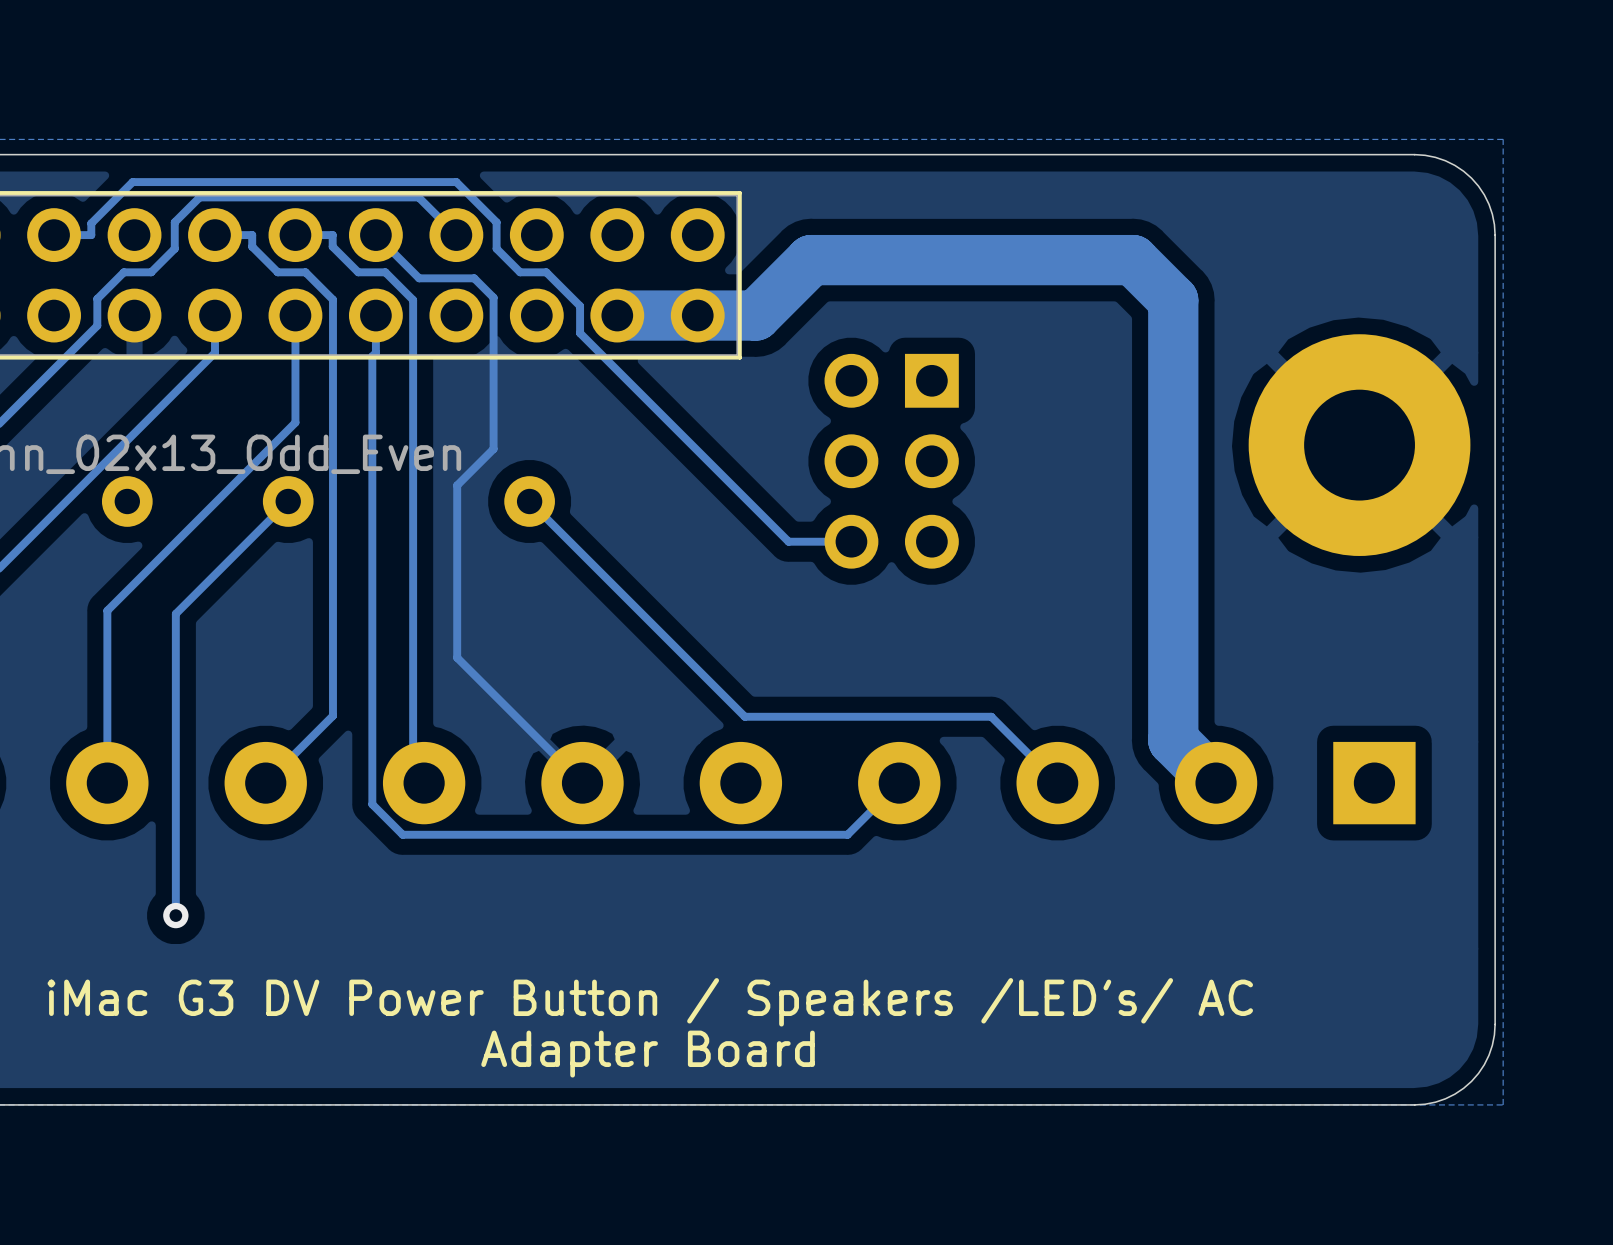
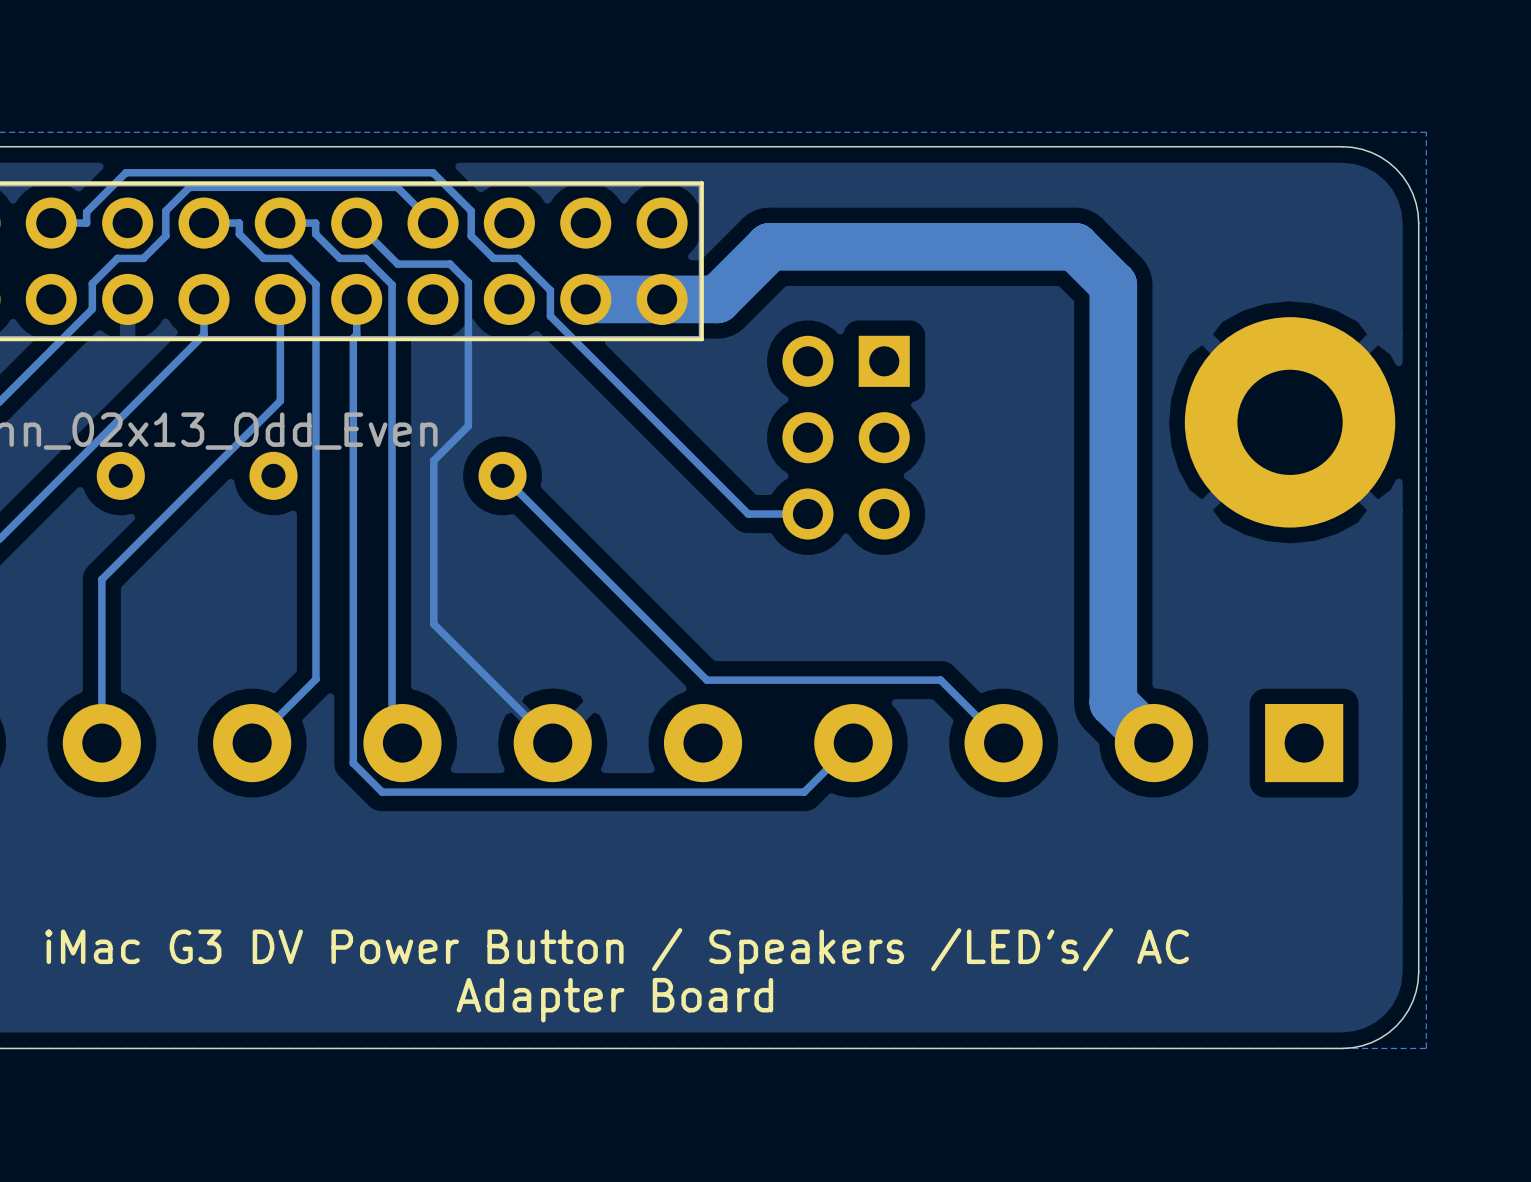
track: (288, 501) (175, 613) (175, 915) -> none
via: (175, 915) -> none

